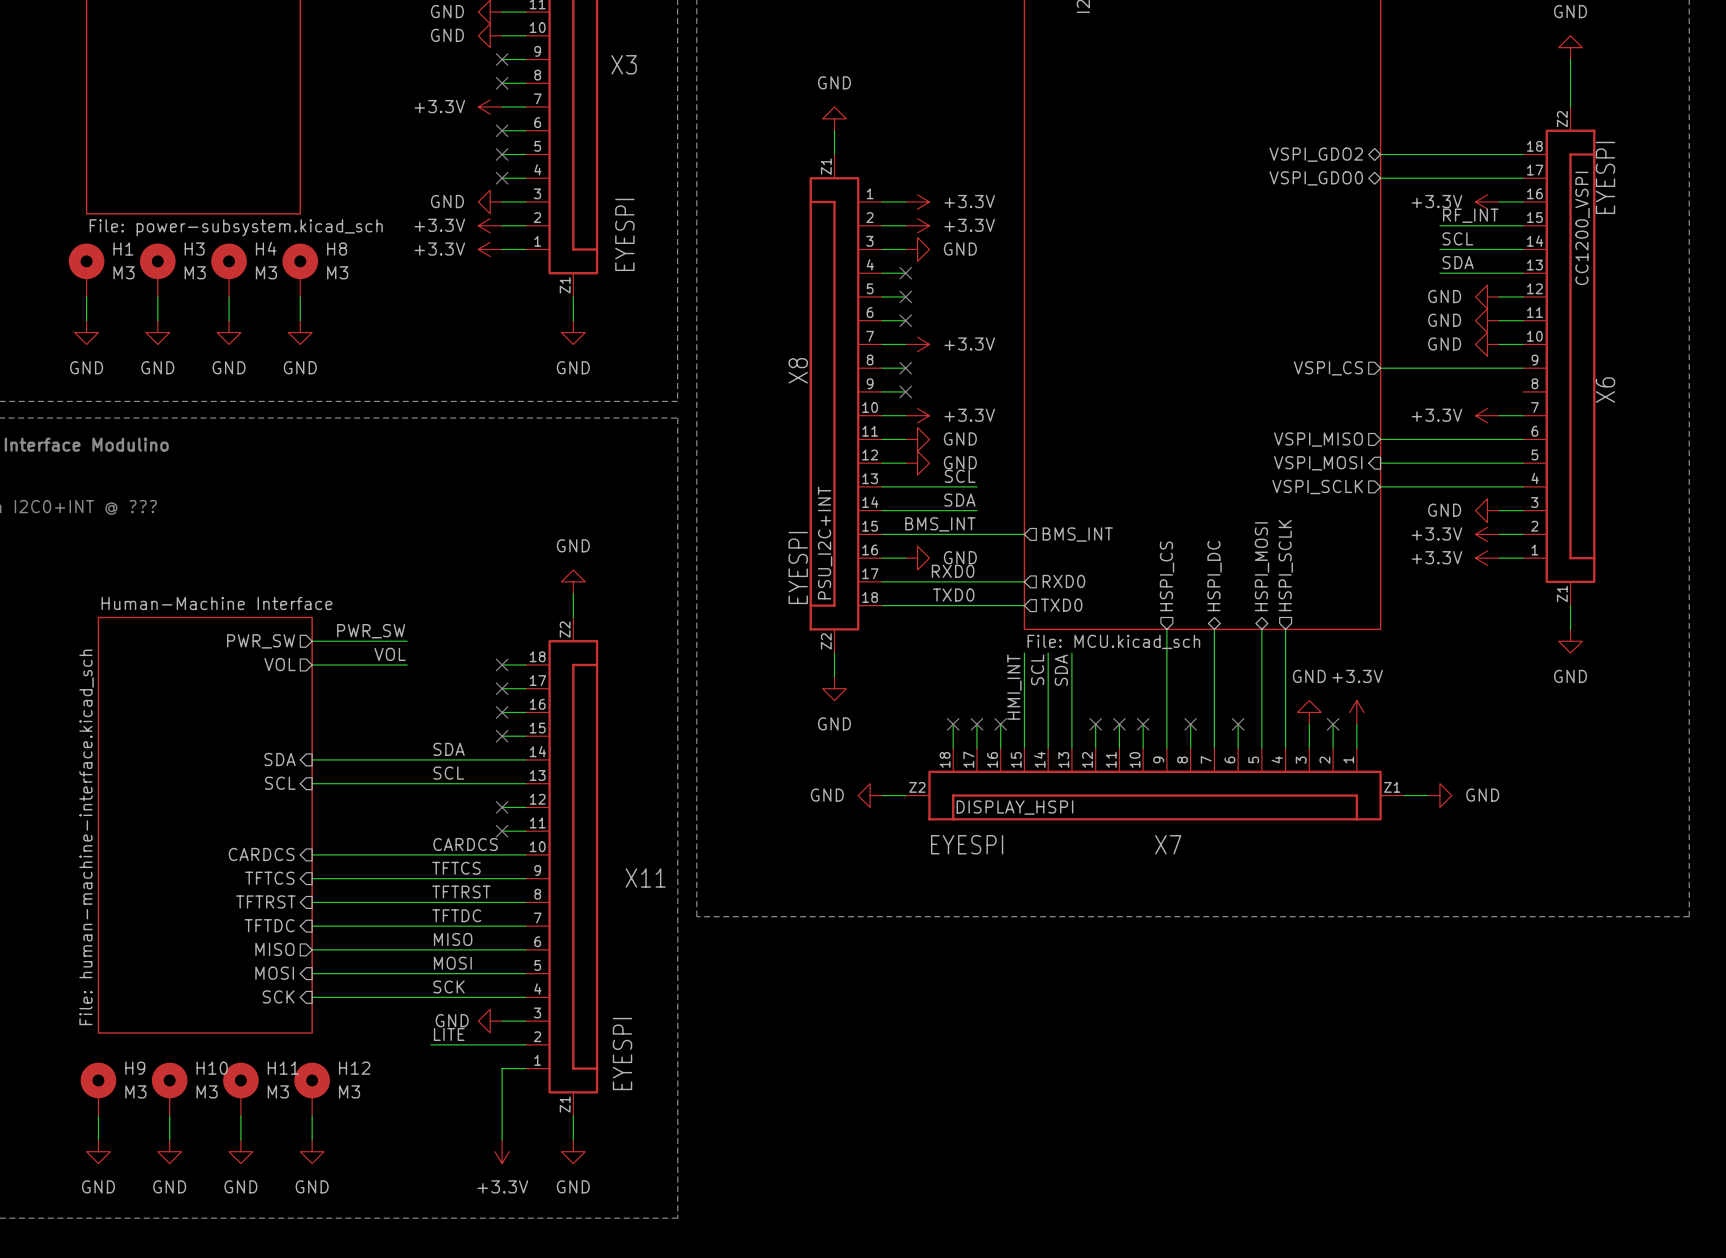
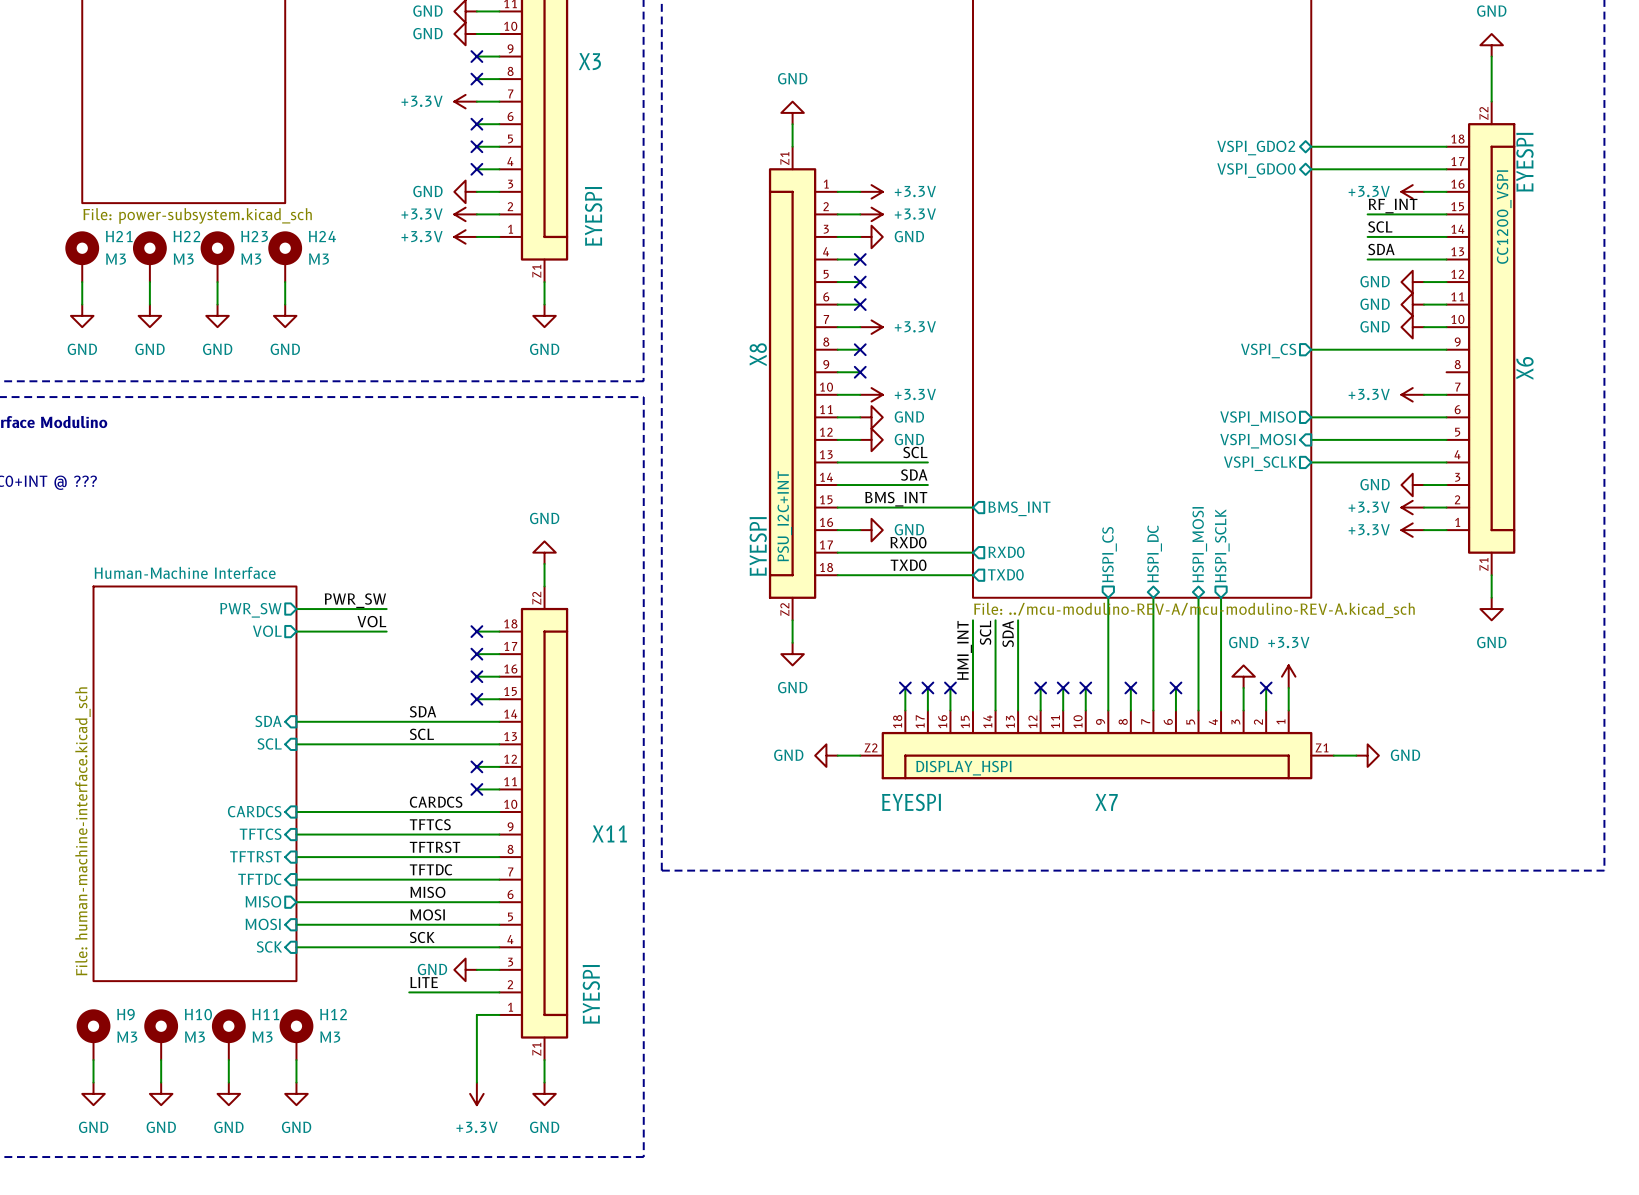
H4 name: H4 (266, 248) -> H23 (254, 236)
H1 name: H1 (123, 249) -> H21 (119, 236)
H3 name: H3 (194, 249) -> H22 (186, 236)
H8 name: H8 (337, 249) -> H24 (322, 236)
sheet value: File: MCU.kicad_sch (1113, 641) -> File: ../mcu-modulino-REV-A/mcu-modulino-REV-A.kicad_sch (1194, 610)

